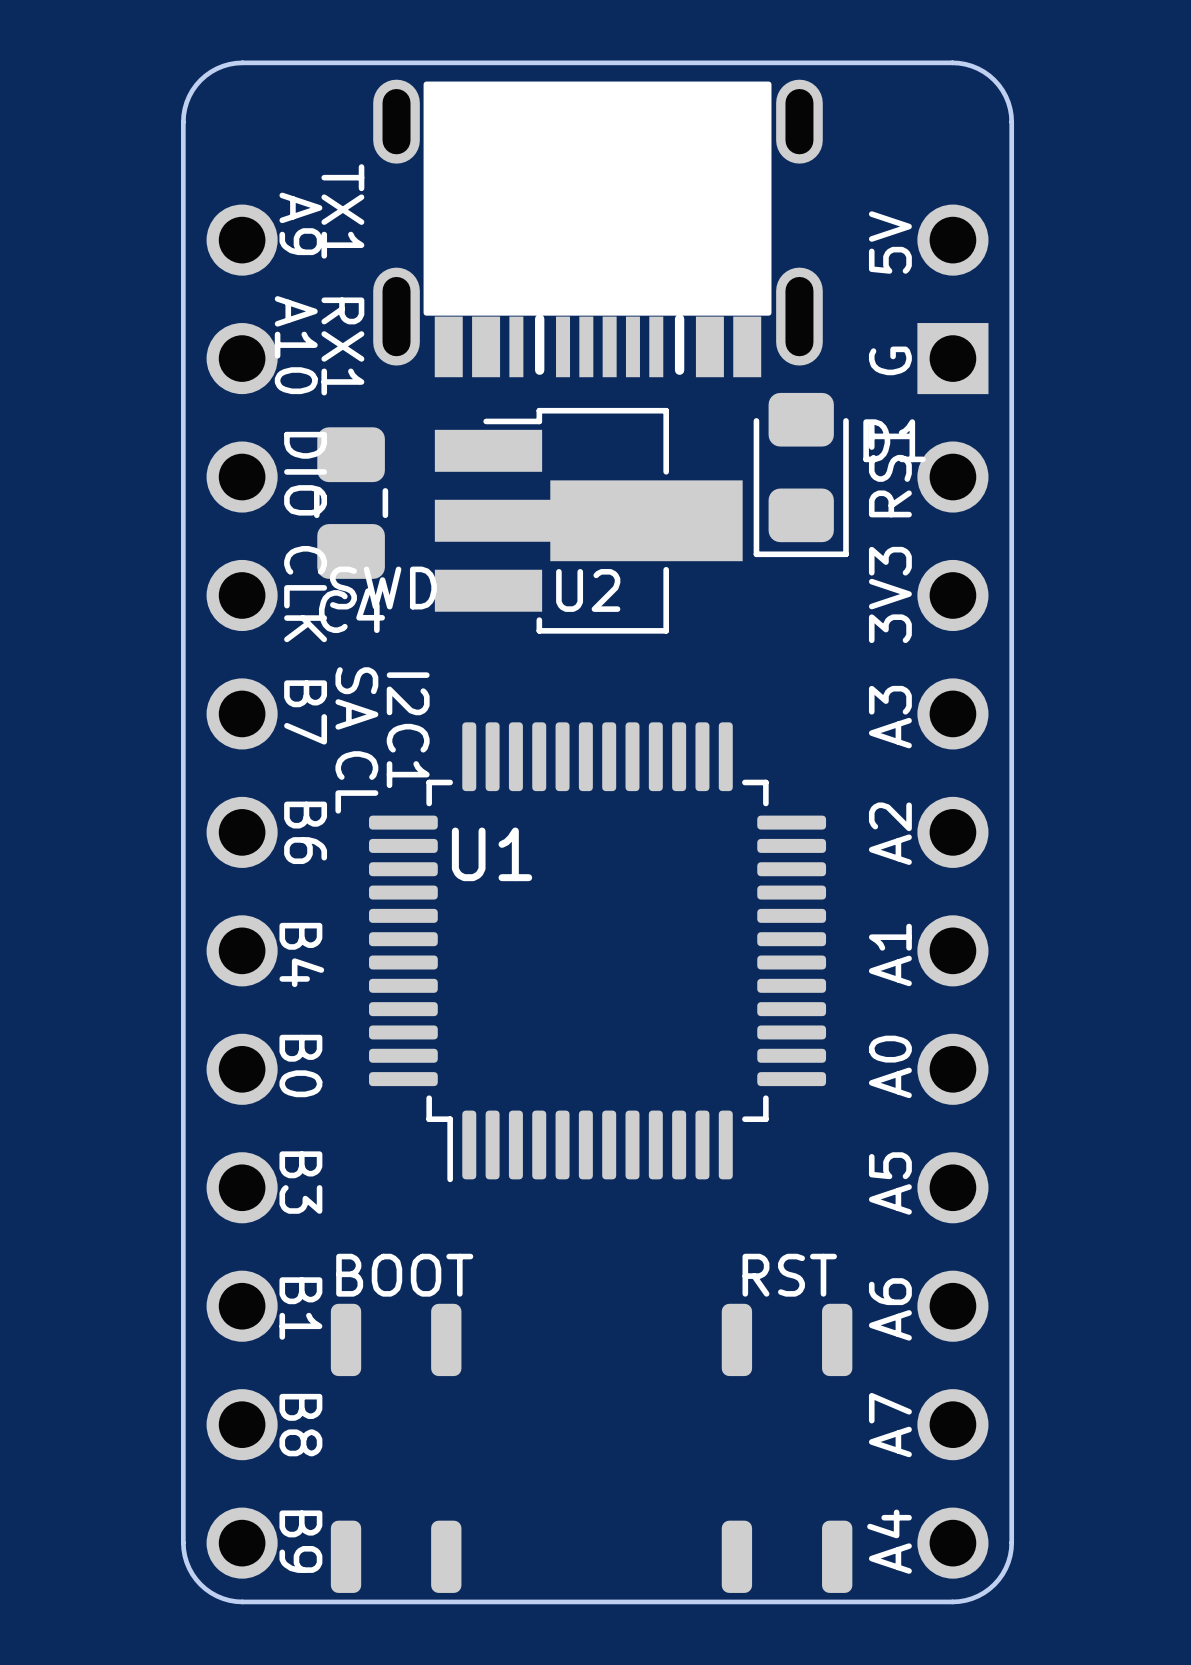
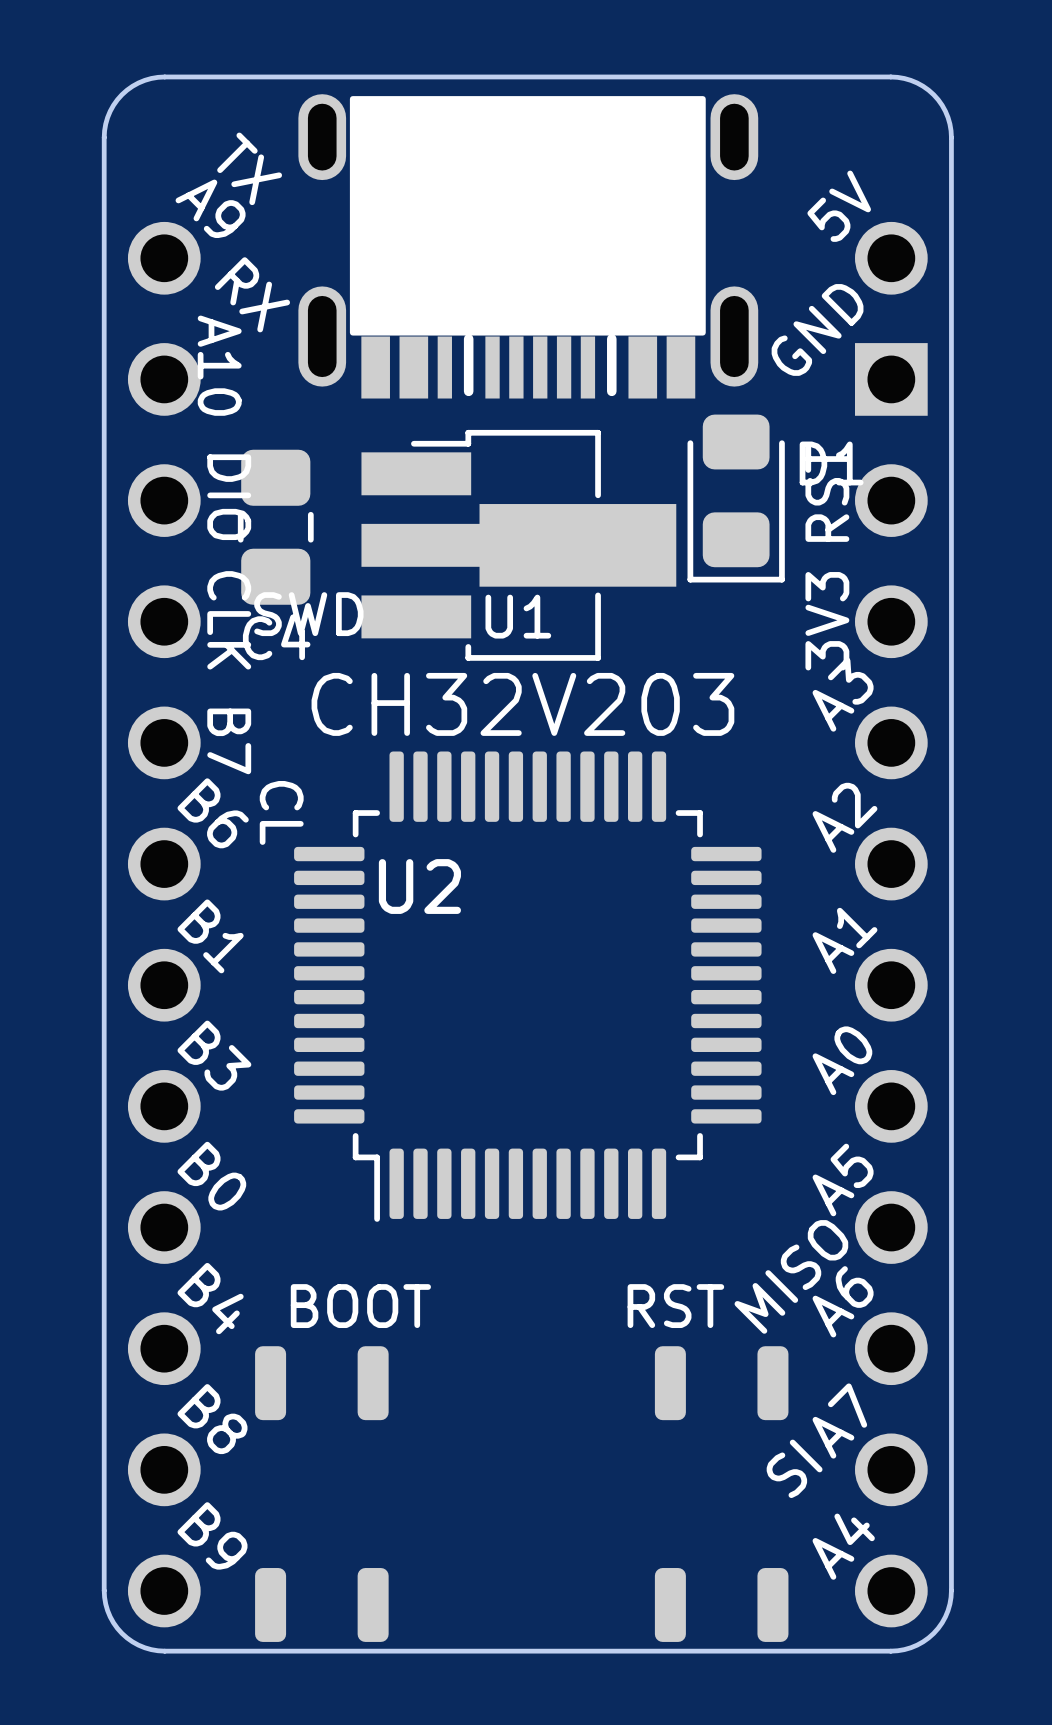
text: none -> TX (249, 168)
text rotation: 0° (300, 223) -> 45° counterclockwise (210, 208)
text rotation: 0° (890, 242) -> 45° clockwise (839, 206)
text: TX1 RX1 (342, 279) -> RX (252, 294)
text: none -> GND (817, 329)
text: G (890, 360) -> none
U2 name: U2 (588, 590) -> U1 (518, 616)
text: none -> CH32V203 (522, 704)
text: SA (356, 698) -> none
text rotation: 0° (890, 717) -> 45° clockwise (843, 694)
text: I2C1 (408, 730) -> none
text rotation: 0° (305, 832) -> 45° counterclockwise (213, 813)
text rotation: 0° (890, 833) -> 45° clockwise (844, 817)
U1 name: U1 (492, 854) -> U2 (419, 886)
text rotation: 0° (301, 954) -> 45° counterclockwise (210, 1298)
text position: B4 (301, 954) -> B4 (210, 1298)
text rotation: 0° (890, 954) -> 45° clockwise (844, 940)
text rotation: 0° (300, 1065) -> 45° counterclockwise (211, 1176)
text rotation: 0° (890, 1066) -> 45° clockwise (842, 1060)
text rotation: 0° (300, 1182) -> 45° counterclockwise (214, 1055)
text position: B3 (300, 1182) -> B3 (214, 1055)
text rotation: 0° (890, 1183) -> 45° clockwise (843, 1179)
text: none -> MISO (791, 1276)
text position: BOOT (404, 1275) -> BOOT (360, 1306)
text position: RST (789, 1275) -> RST (675, 1306)
text rotation: 0° (300, 1308) -> 45° counterclockwise (210, 936)
text position: B1 (300, 1308) -> B1 (210, 936)
text rotation: 0° (890, 1309) -> 45° clockwise (843, 1301)
text: none -> SI (794, 1468)
text rotation: 0° (300, 1425) -> 45° counterclockwise (212, 1419)
text rotation: 0° (890, 1425) -> 45° clockwise (839, 1421)
text rotation: 0° (300, 1541) -> 45° counterclockwise (212, 1535)
text rotation: 0° (889, 1541) -> 45° clockwise (843, 1546)

